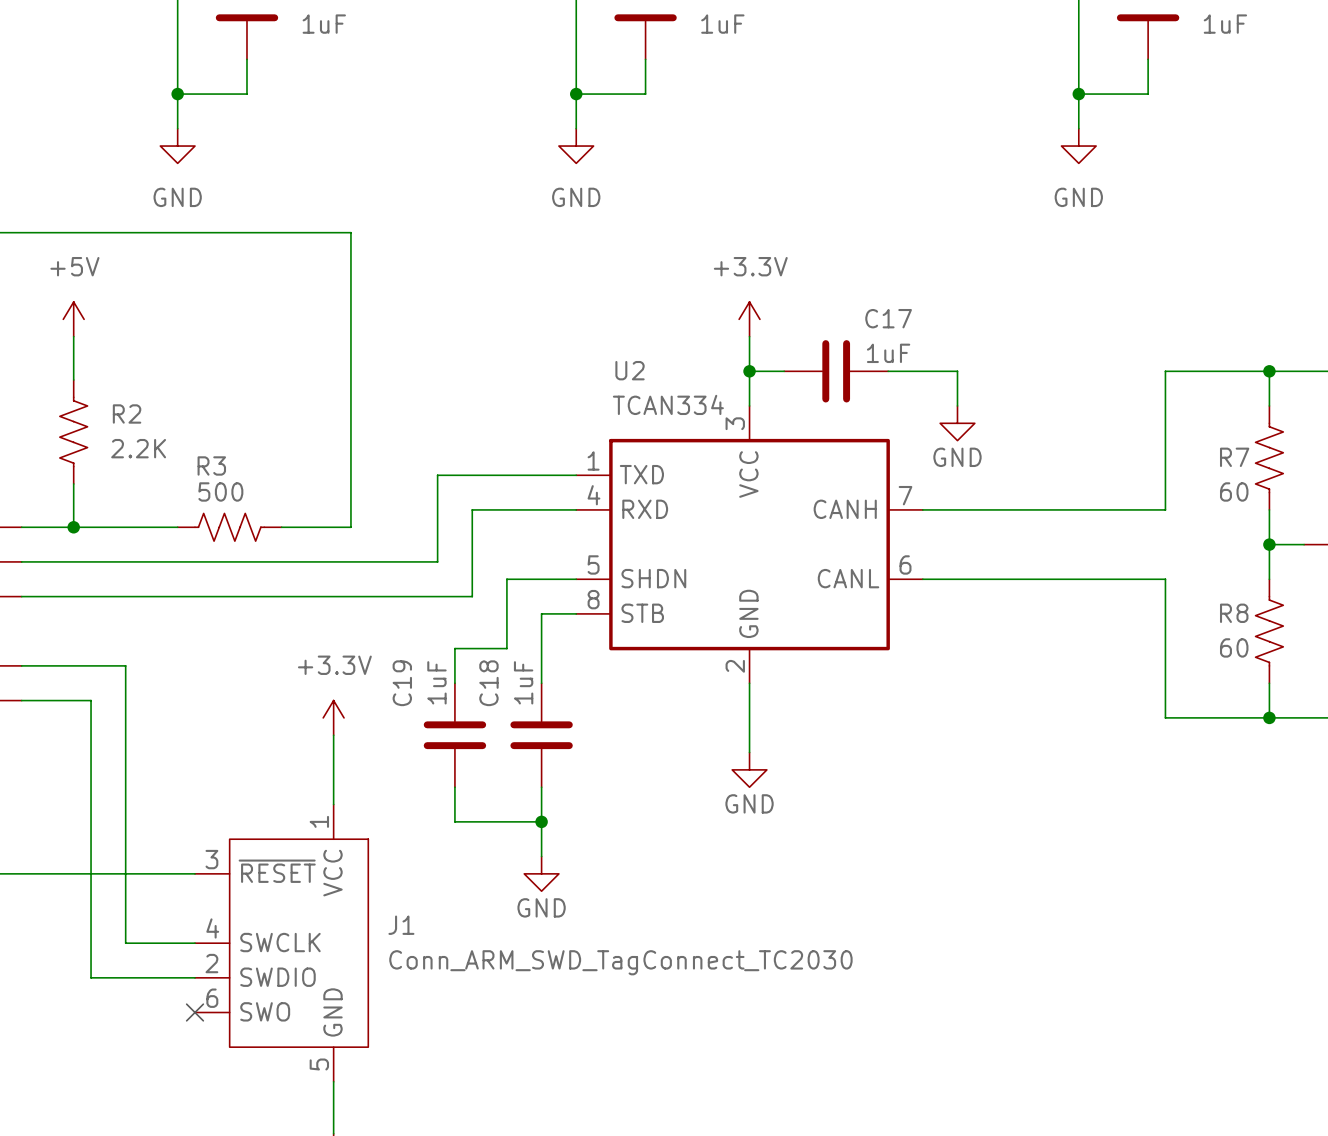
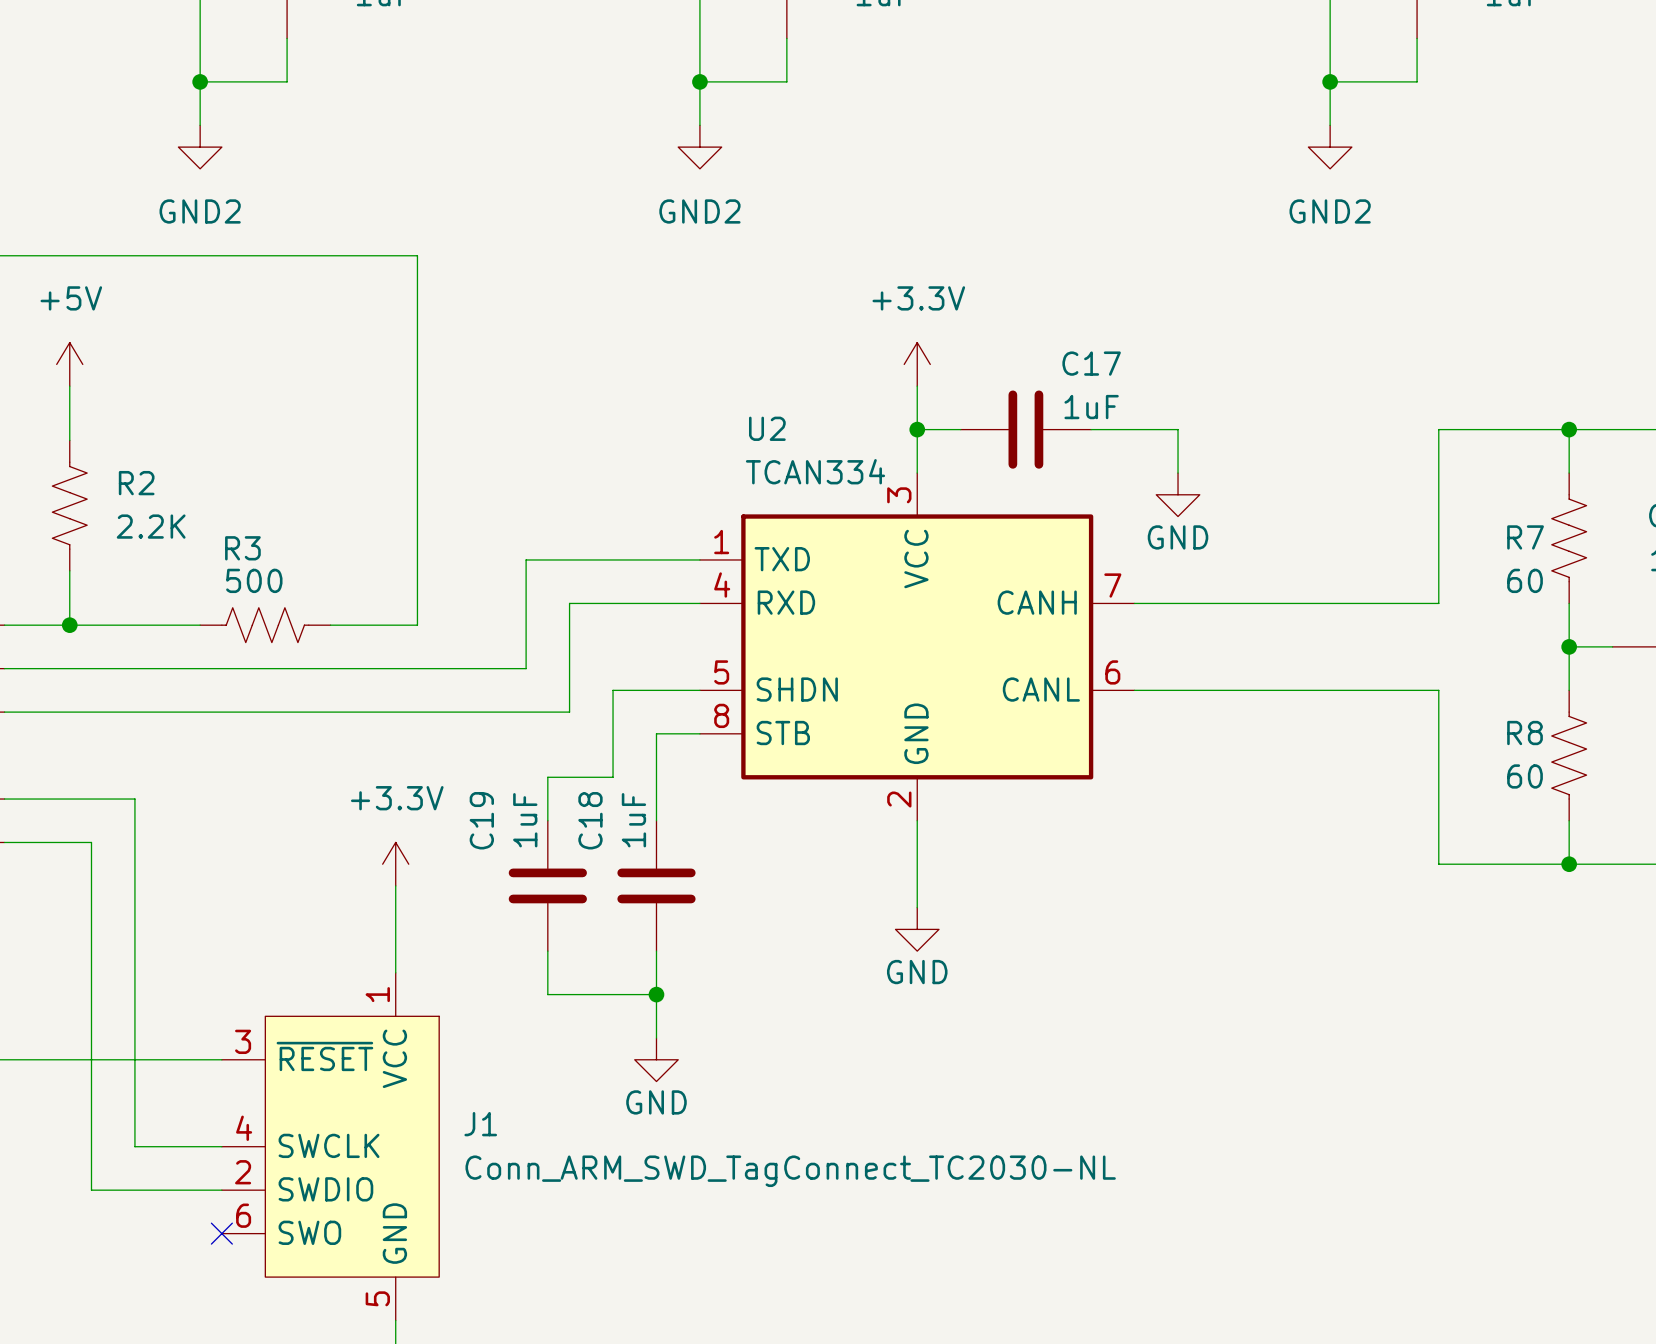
power symbol: GND (177, 146) -> GND2 (200, 147)
power symbol: GND (576, 146) -> GND2 (699, 147)
power symbol: GND (1078, 146) -> GND2 (1330, 147)
J1 value: Conn_ARM_SWD_TagConnect_TC2030 (620, 962) -> Conn_ARM_SWD_TagConnect_TC2030-NL (790, 1171)

